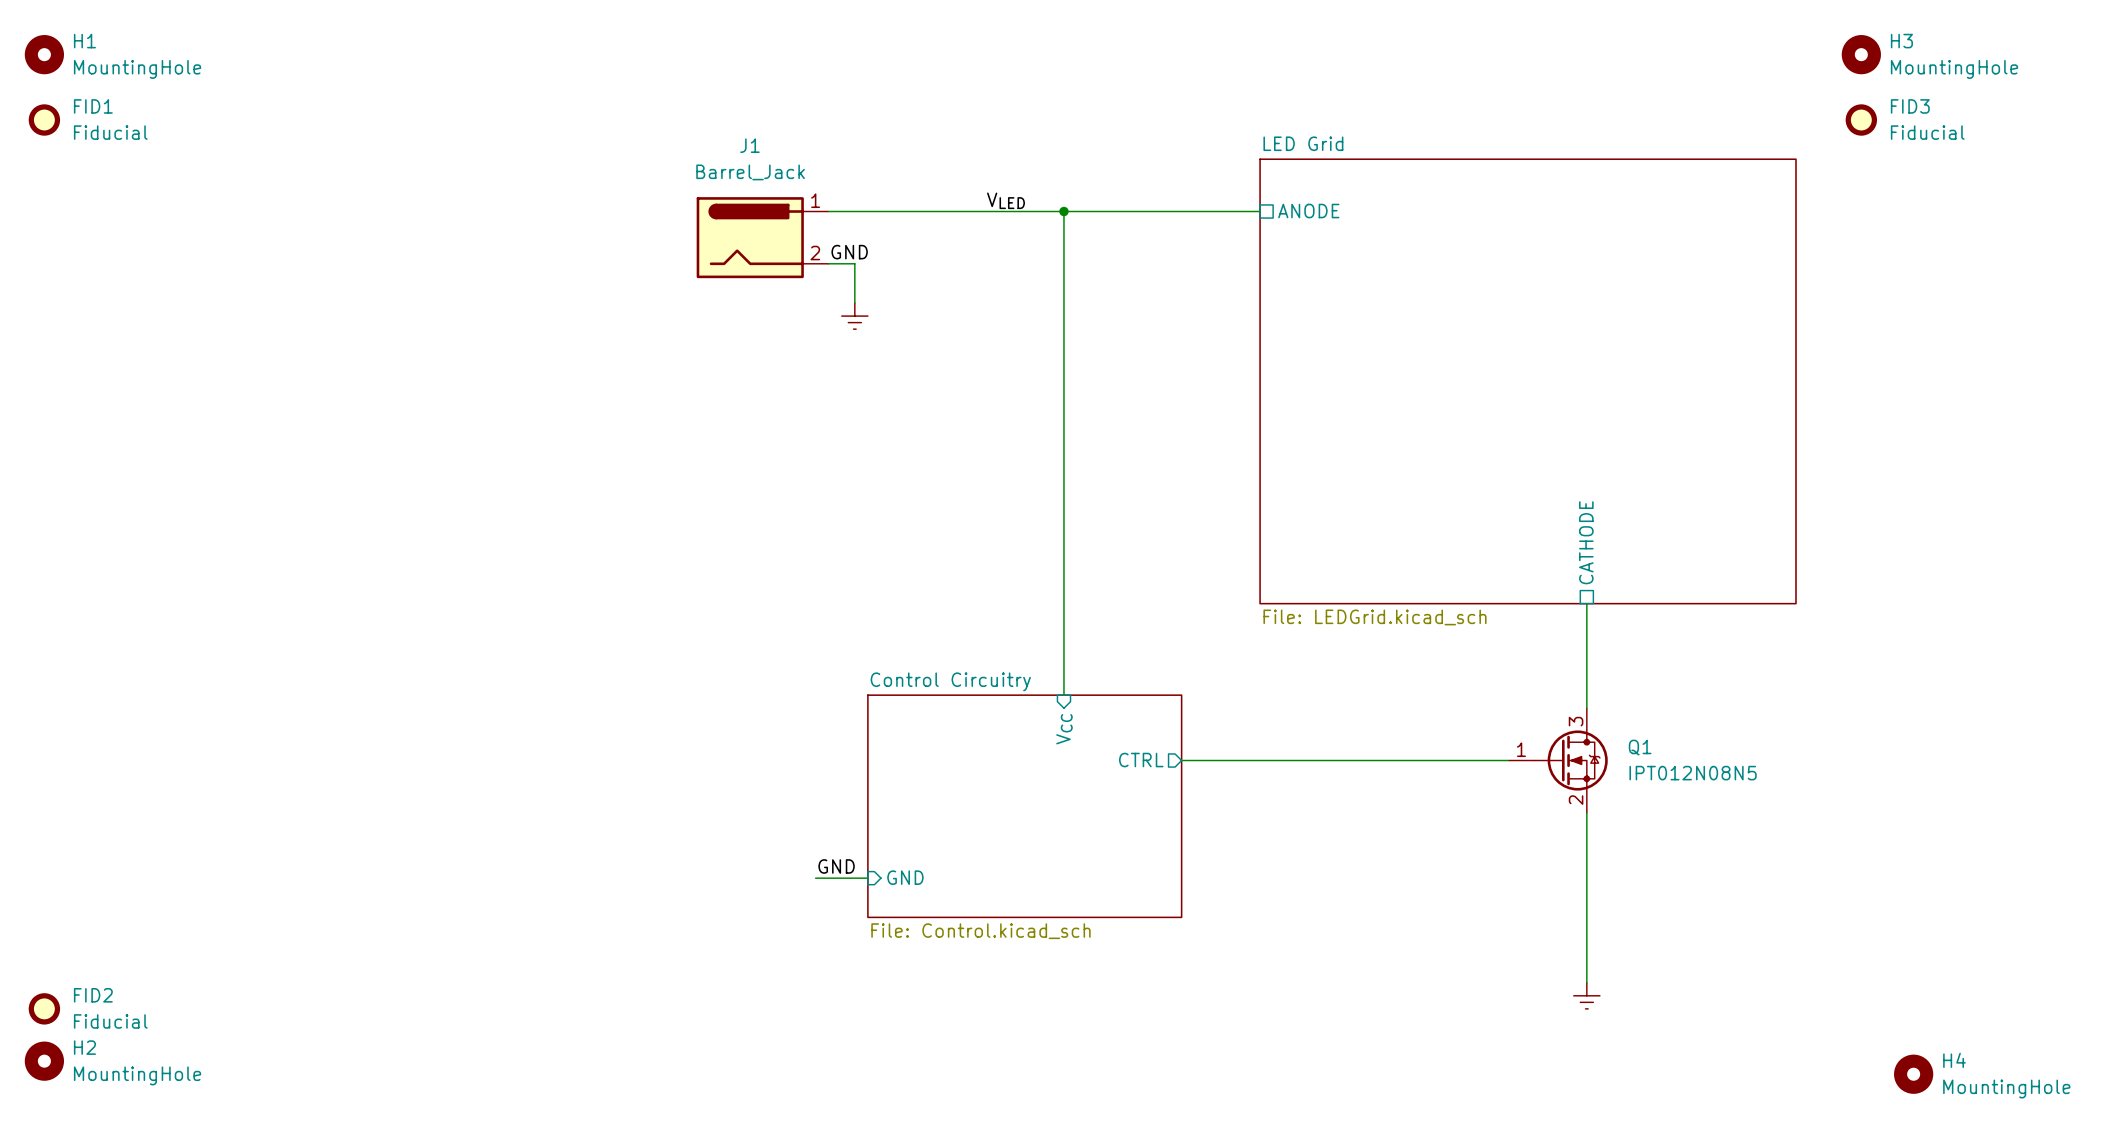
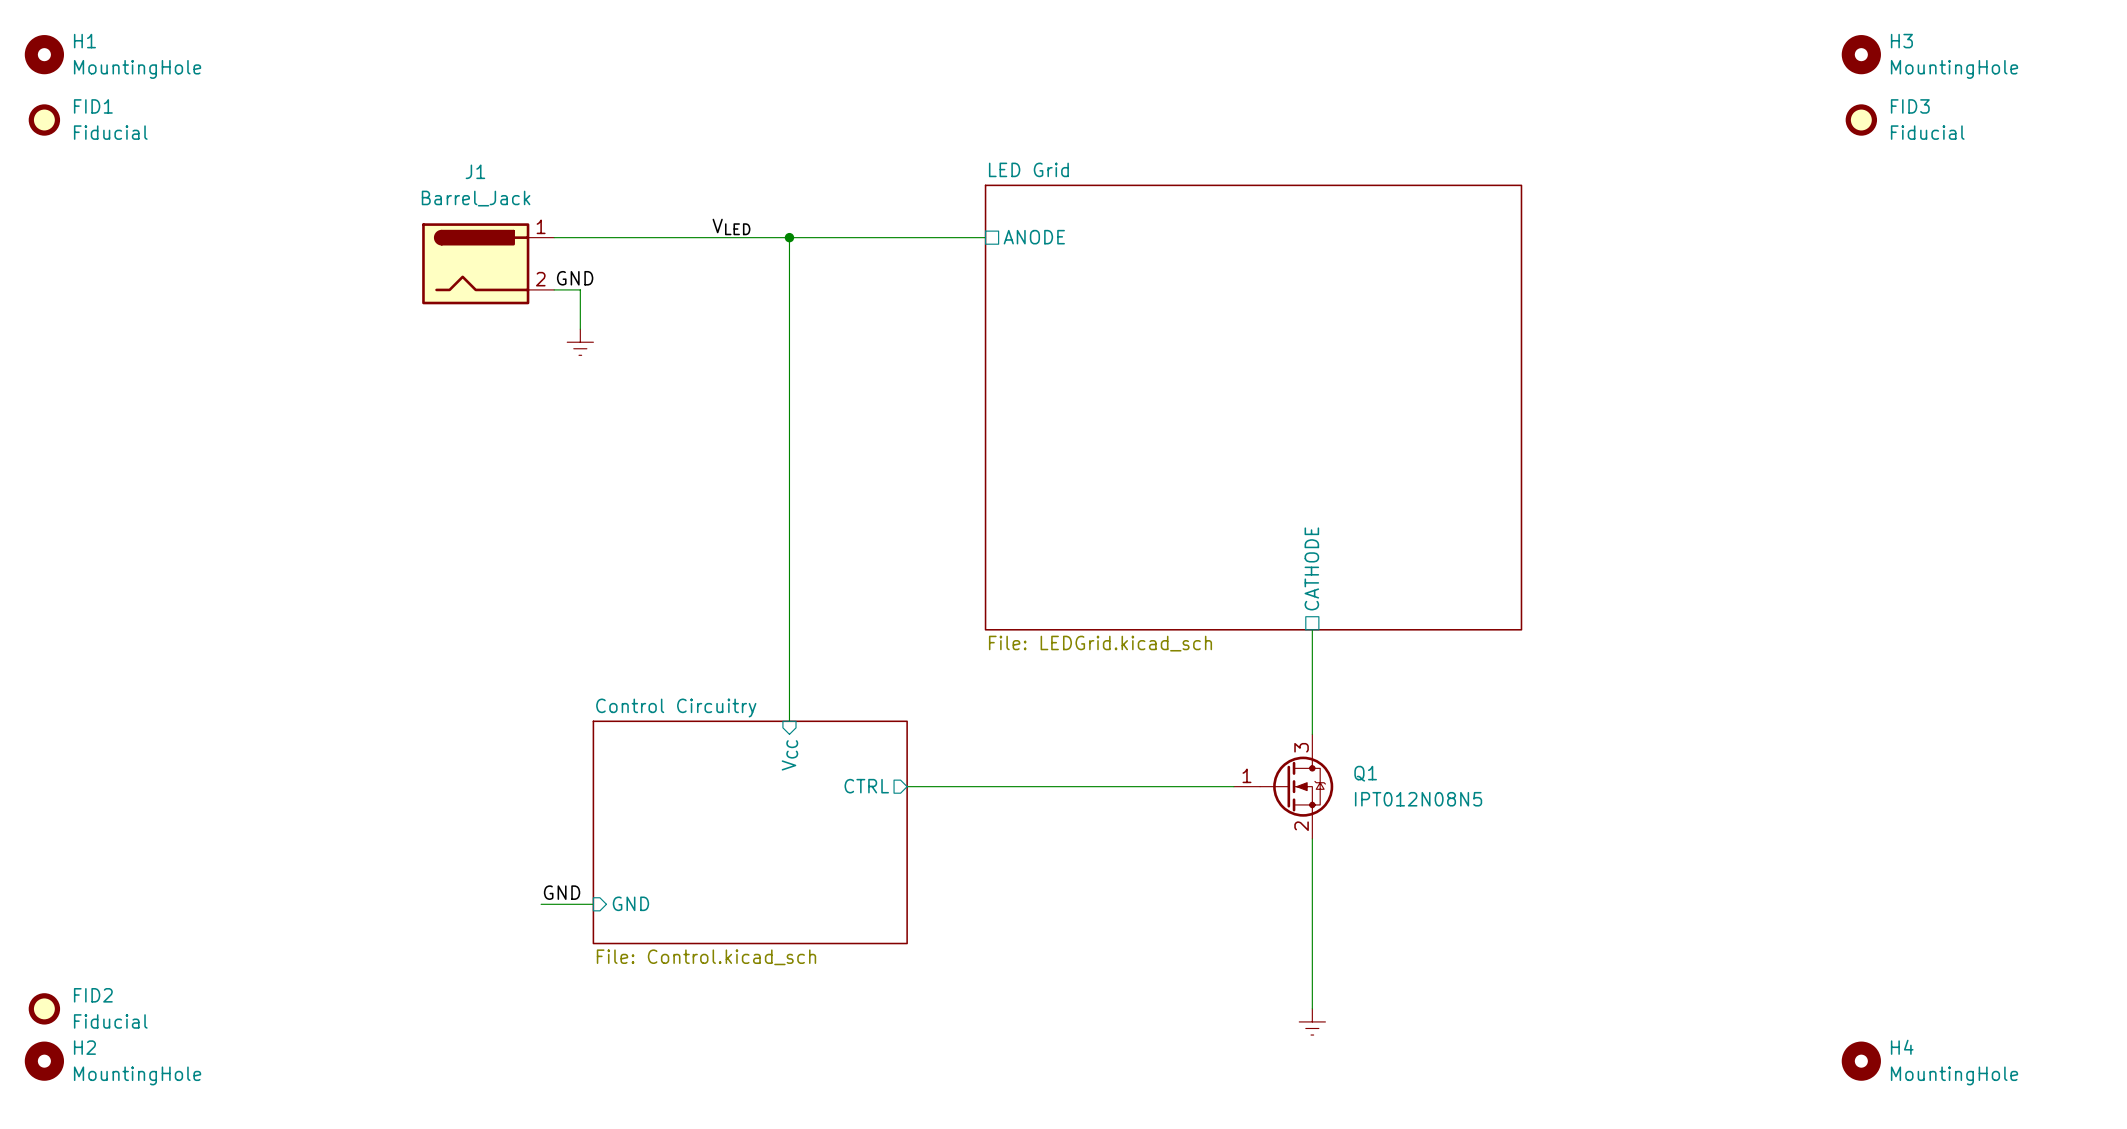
label: VLED (1006, 200) -> none
wire: (828, 211) (1260, 211) -> none
wire: (1063, 211) (1063, 695) -> none
junction: (1063, 211) -> none
sheet pin: ANODE (1308, 211) -> none
label: none -> VLED (731, 226)
wire: none -> (554, 237) (985, 237)
J1 position: (762, 237) -> (488, 263)
wire: none -> (789, 237) (789, 721)
junction: none -> (789, 237)
sheet pin: none -> ANODE (1034, 237)
label: GND (849, 252) -> none
wire: (828, 263) (854, 263) (854, 303) -> none
label: none -> GND (575, 278)
wire: none -> (554, 289) (580, 289) (580, 329)
power symbol: (854, 316) -> none
power symbol: none -> (580, 342)
sheet LED Grid: File: LEDGrid.kicad_sch (1528, 381) -> none
sheet LED Grid: none -> File: LEDGrid.kicad_sch (1253, 407)
sheet pin: CATHODE (1586, 542) -> none
sheet pin: none -> CATHODE (1311, 568)
wire: (1586, 603) (1586, 708) -> none
wire: none -> (1312, 629) (1312, 734)
sheet pin: VCC (1064, 729) -> none
sheet pin: none -> VCC (789, 755)
sheet pin: CTRL (1141, 760) -> none
wire: (1181, 760) (1508, 760) -> none
Q1 position: (1558, 760) -> (1283, 786)
sheet pin: none -> CTRL (866, 786)
wire: none -> (907, 786) (1233, 786)
sheet Control Circuitry: File: Control.kicad_sch (1024, 806) -> none
wire: (1586, 812) (1586, 982) -> none
sheet Control Circuitry: none -> File: Control.kicad_sch (750, 832)
wire: none -> (1312, 838) (1312, 1008)
label: GND (836, 866) -> none
sheet pin: GND (905, 877) -> none
wire: (815, 878) (867, 878) -> none
label: none -> GND (562, 892)
sheet pin: none -> GND (630, 903)
wire: none -> (541, 904) (593, 904)
power symbol: (1586, 995) -> none
power symbol: none -> (1312, 1021)
H4 position: (1913, 1074) -> (1861, 1061)

